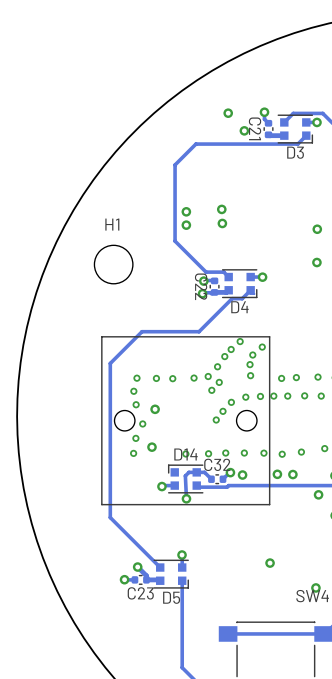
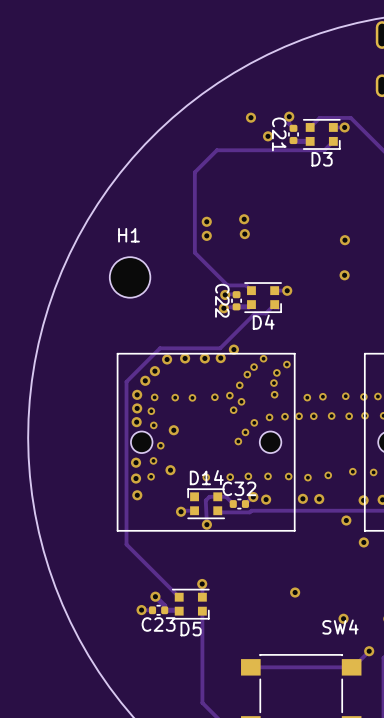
via: none -> (233, 349)
via: none -> (220, 358)
via: none -> (185, 358)
via: none -> (204, 358)
via: none -> (167, 359)
via: none -> (154, 371)
via: none -> (145, 380)
via: none -> (137, 394)
via: none -> (137, 408)
via: none -> (136, 422)
via: none -> (136, 462)
via: none -> (136, 478)
via: none -> (137, 495)

